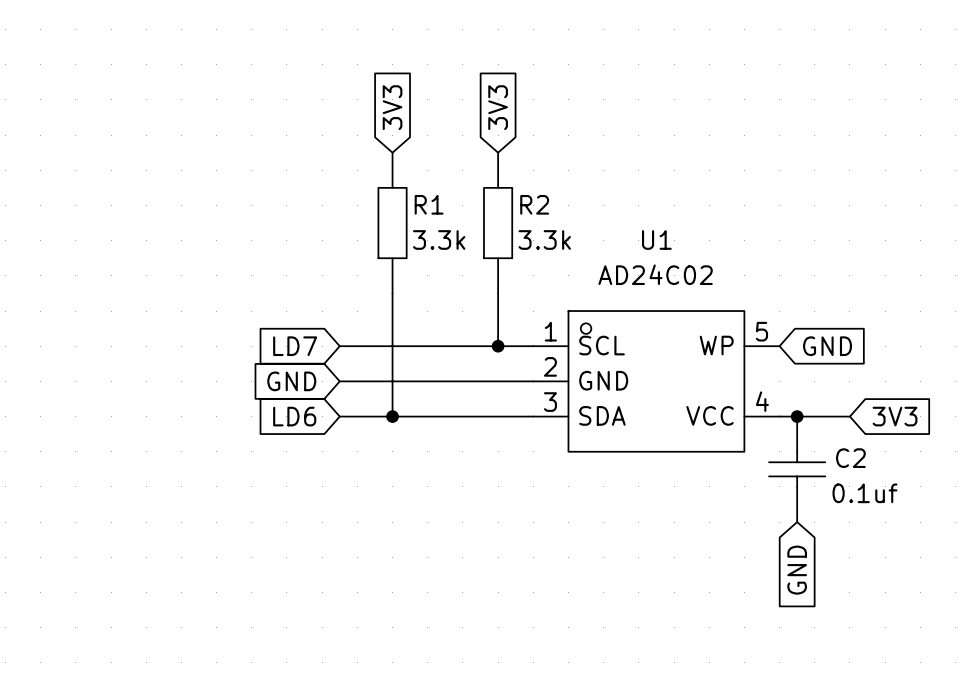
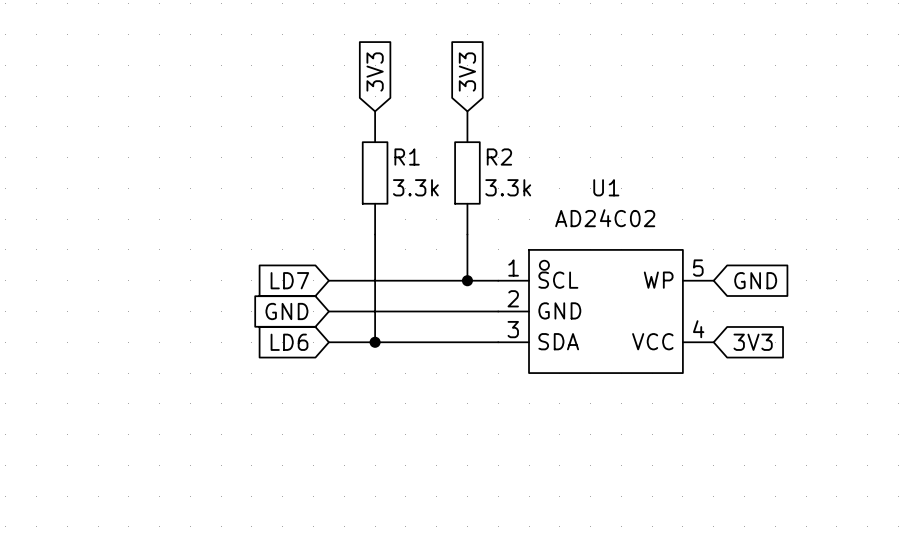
wire: (779, 416) (849, 416) -> none
junction: (797, 416) -> none
global label position: 3V3 (895, 416) -> 3V3 (753, 342)
C2: 0.1uf (797, 469) -> none
global label: GND (797, 570) -> none

